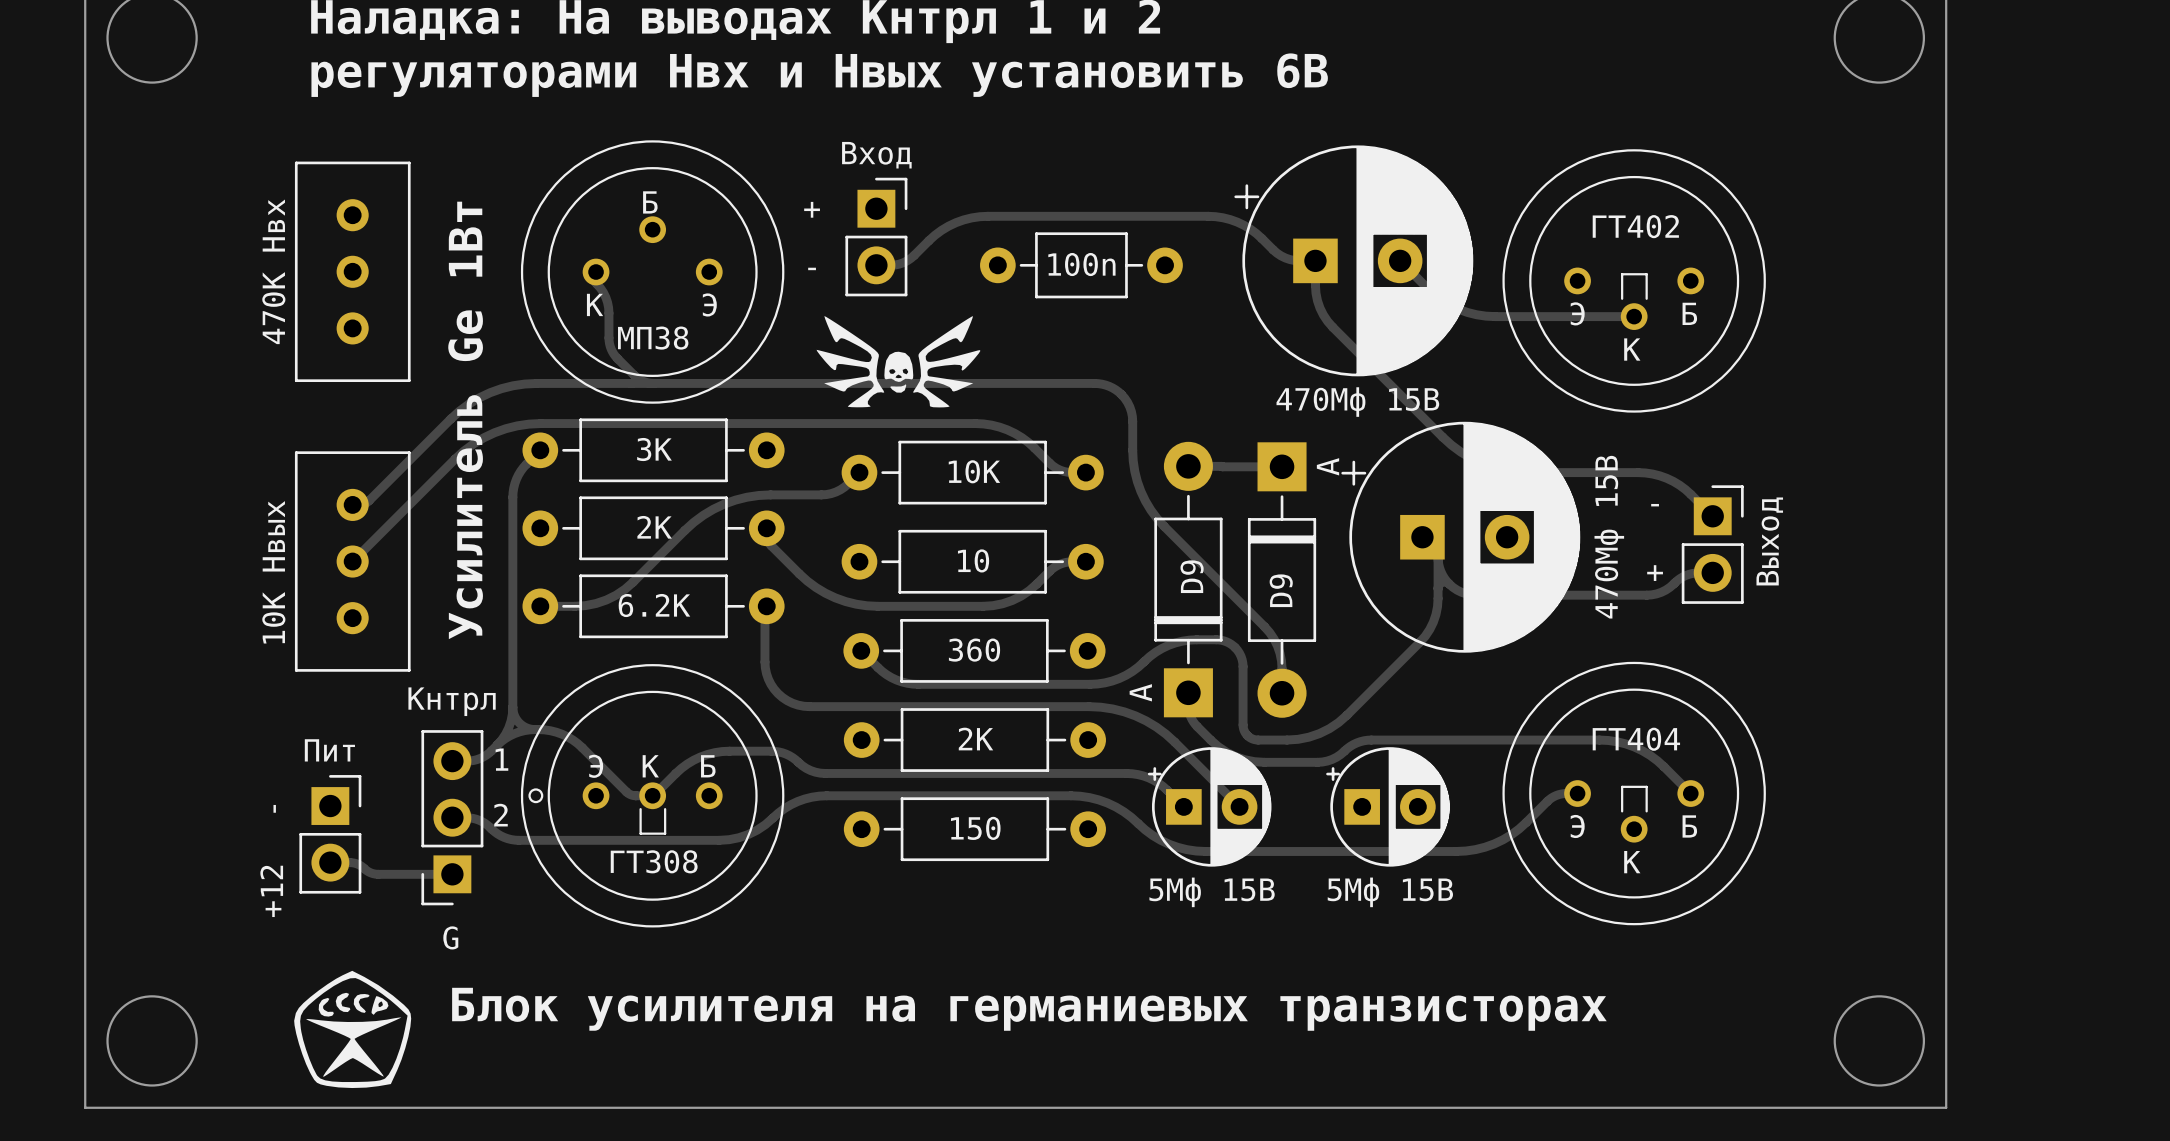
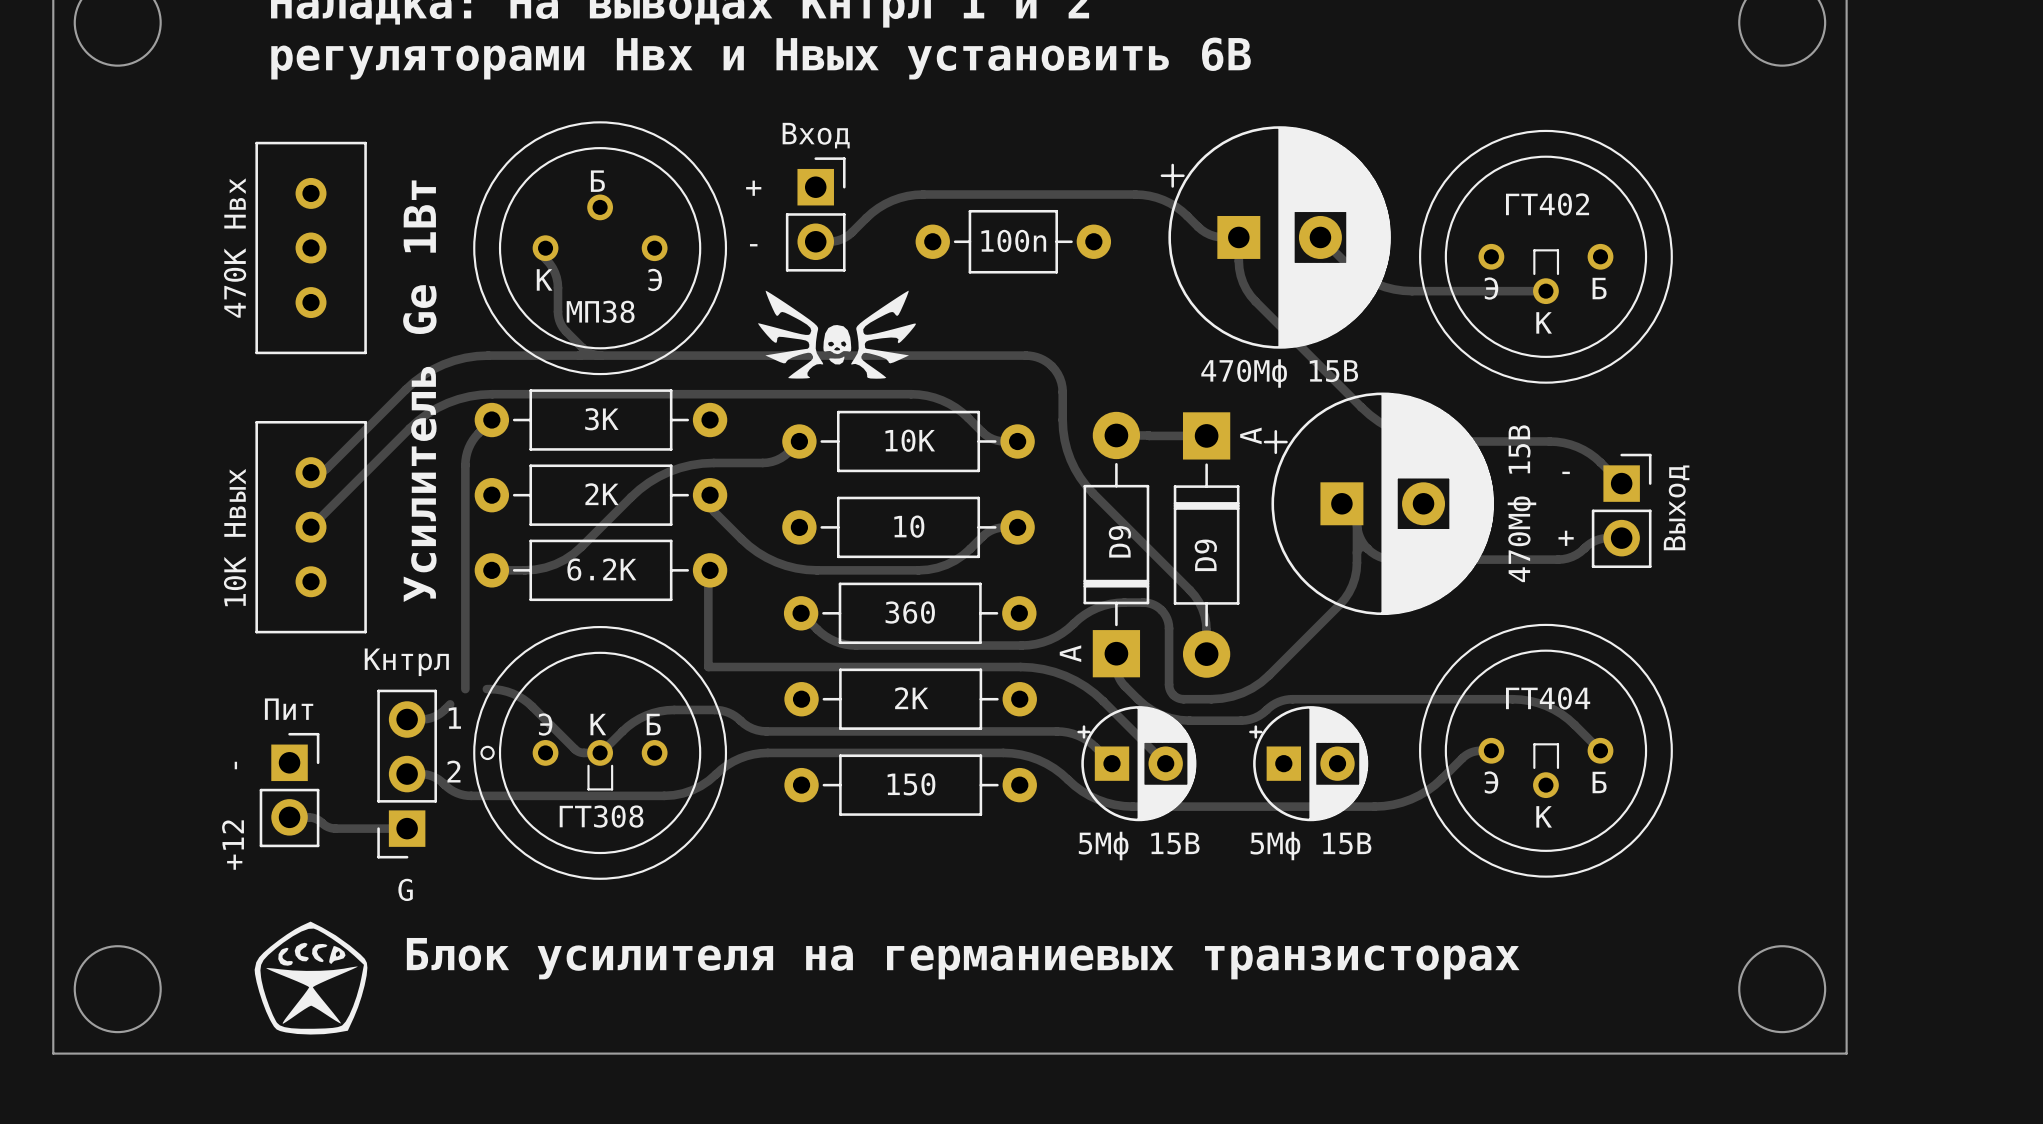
track: (764, 662) (768, 679) (778, 693) (792, 703) (809, 706) -> (708, 624) (708, 667) (751, 667)
track: (512, 707) (515, 716) (519, 723) (525, 727) (535, 729) (514, 733) (497, 745) (508, 727) (512, 707) -> (465, 667) (465, 689)

